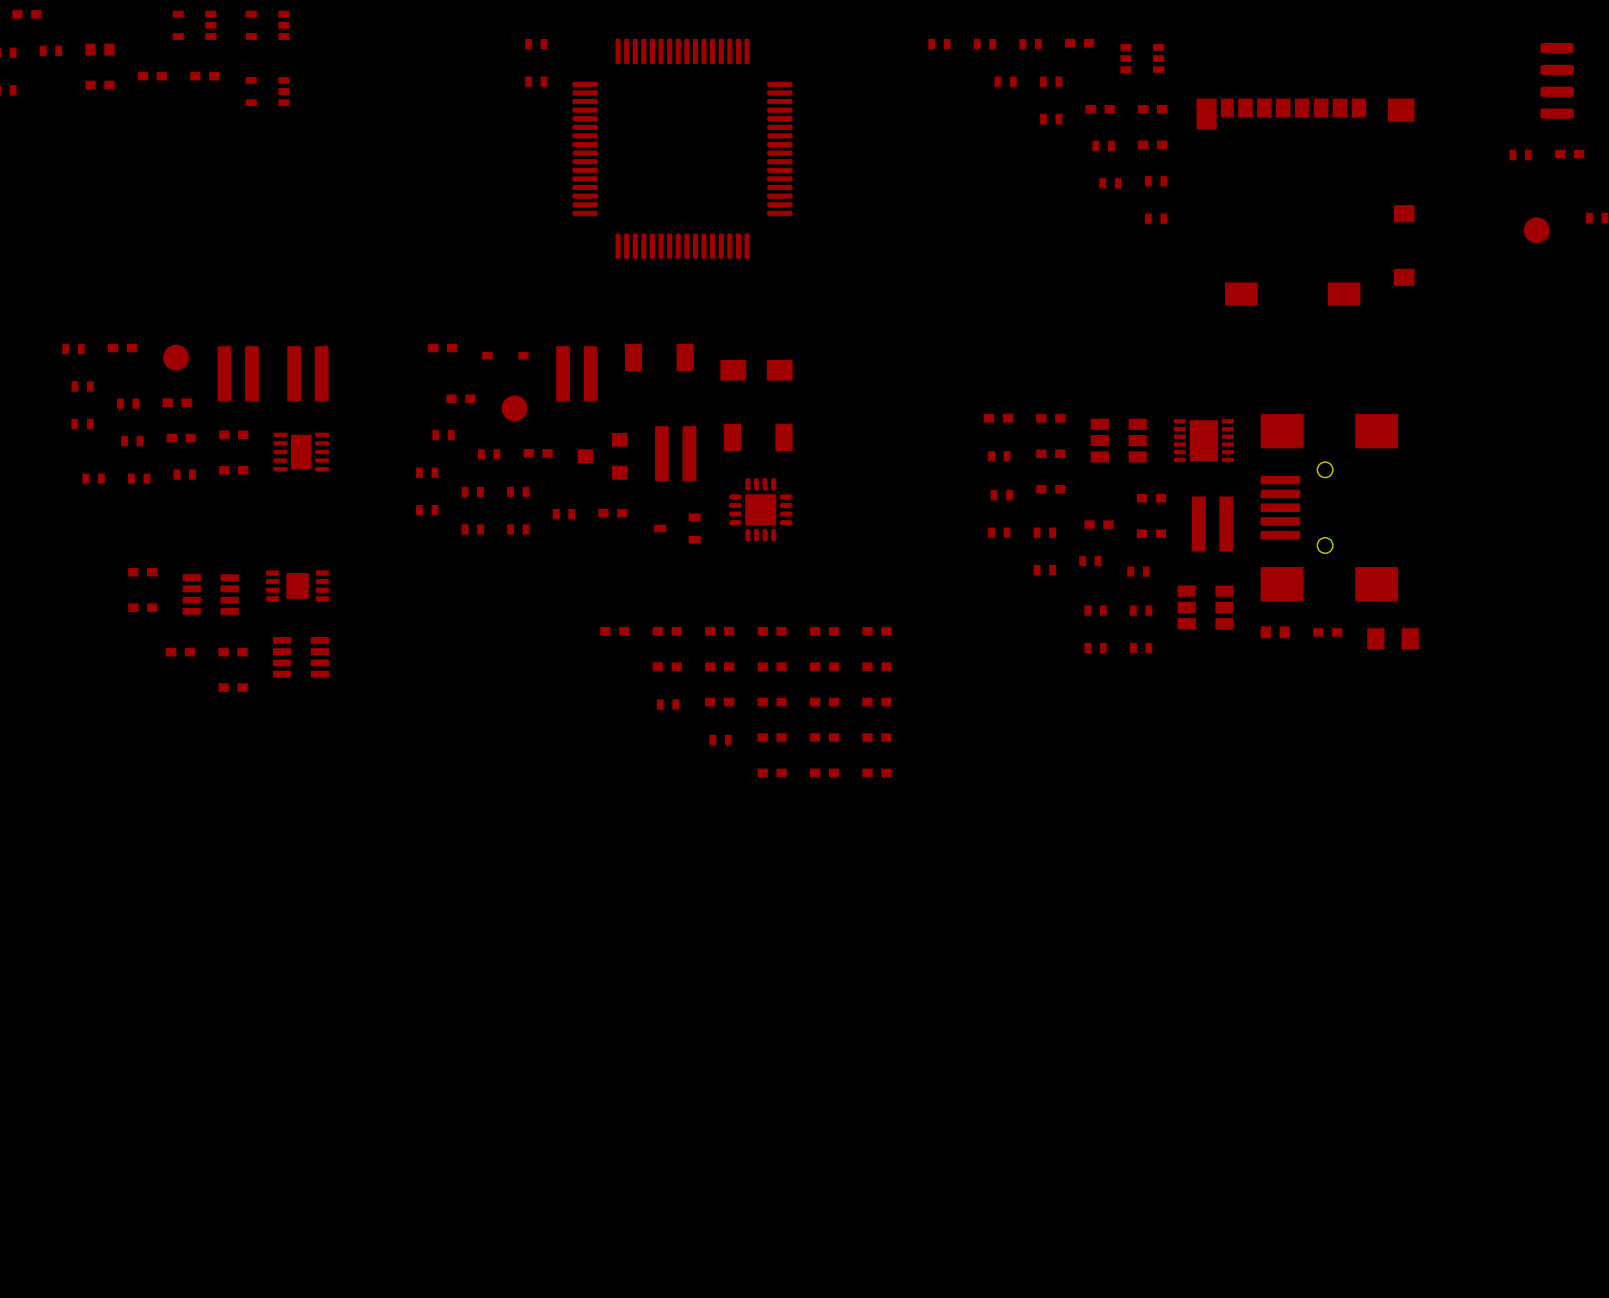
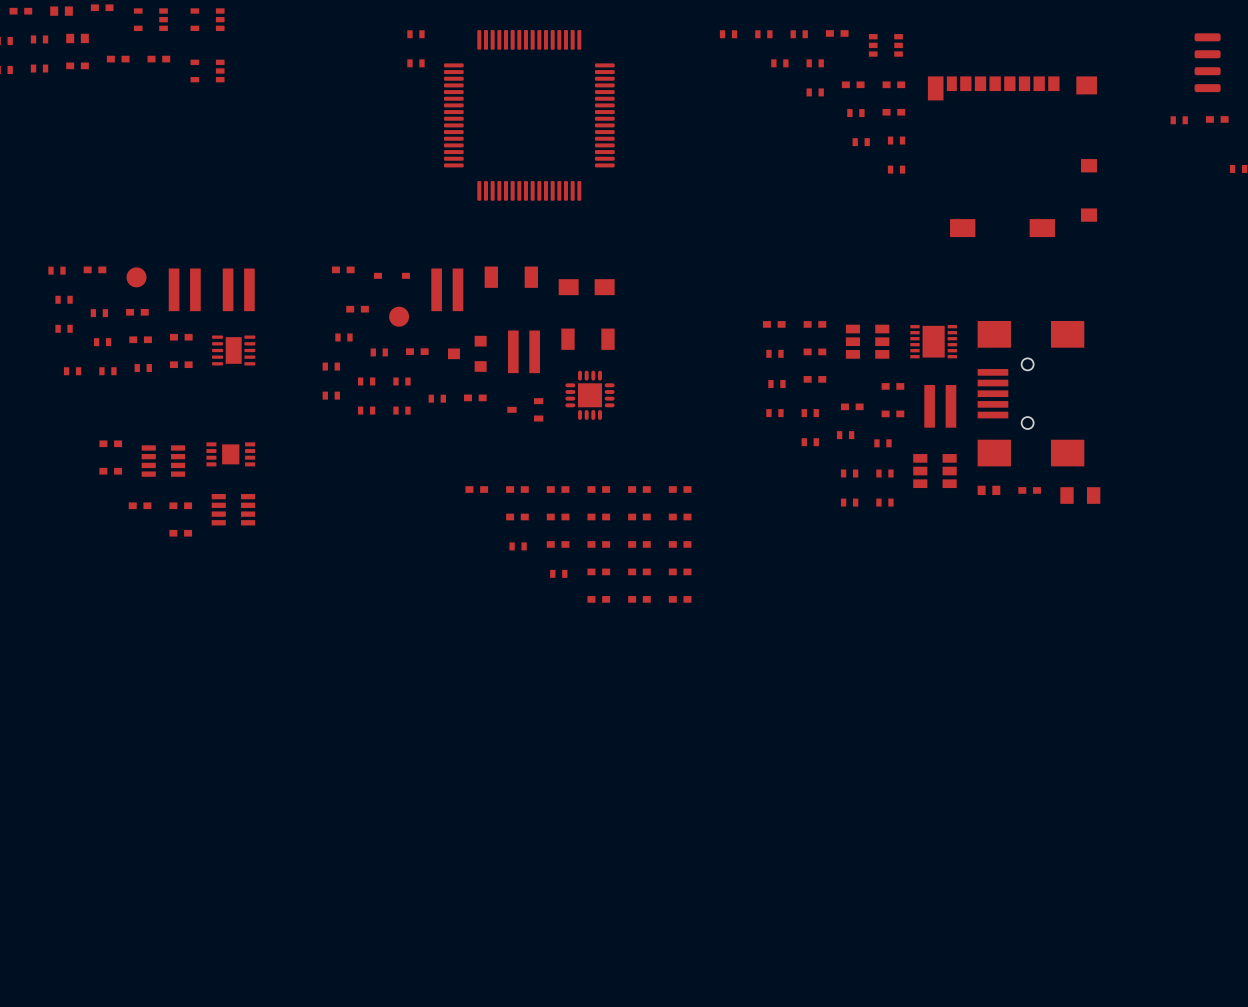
part: none -> (102, 7)
part: none -> (61, 11)
part: none -> (39, 68)
part: (1536, 230) -> none

